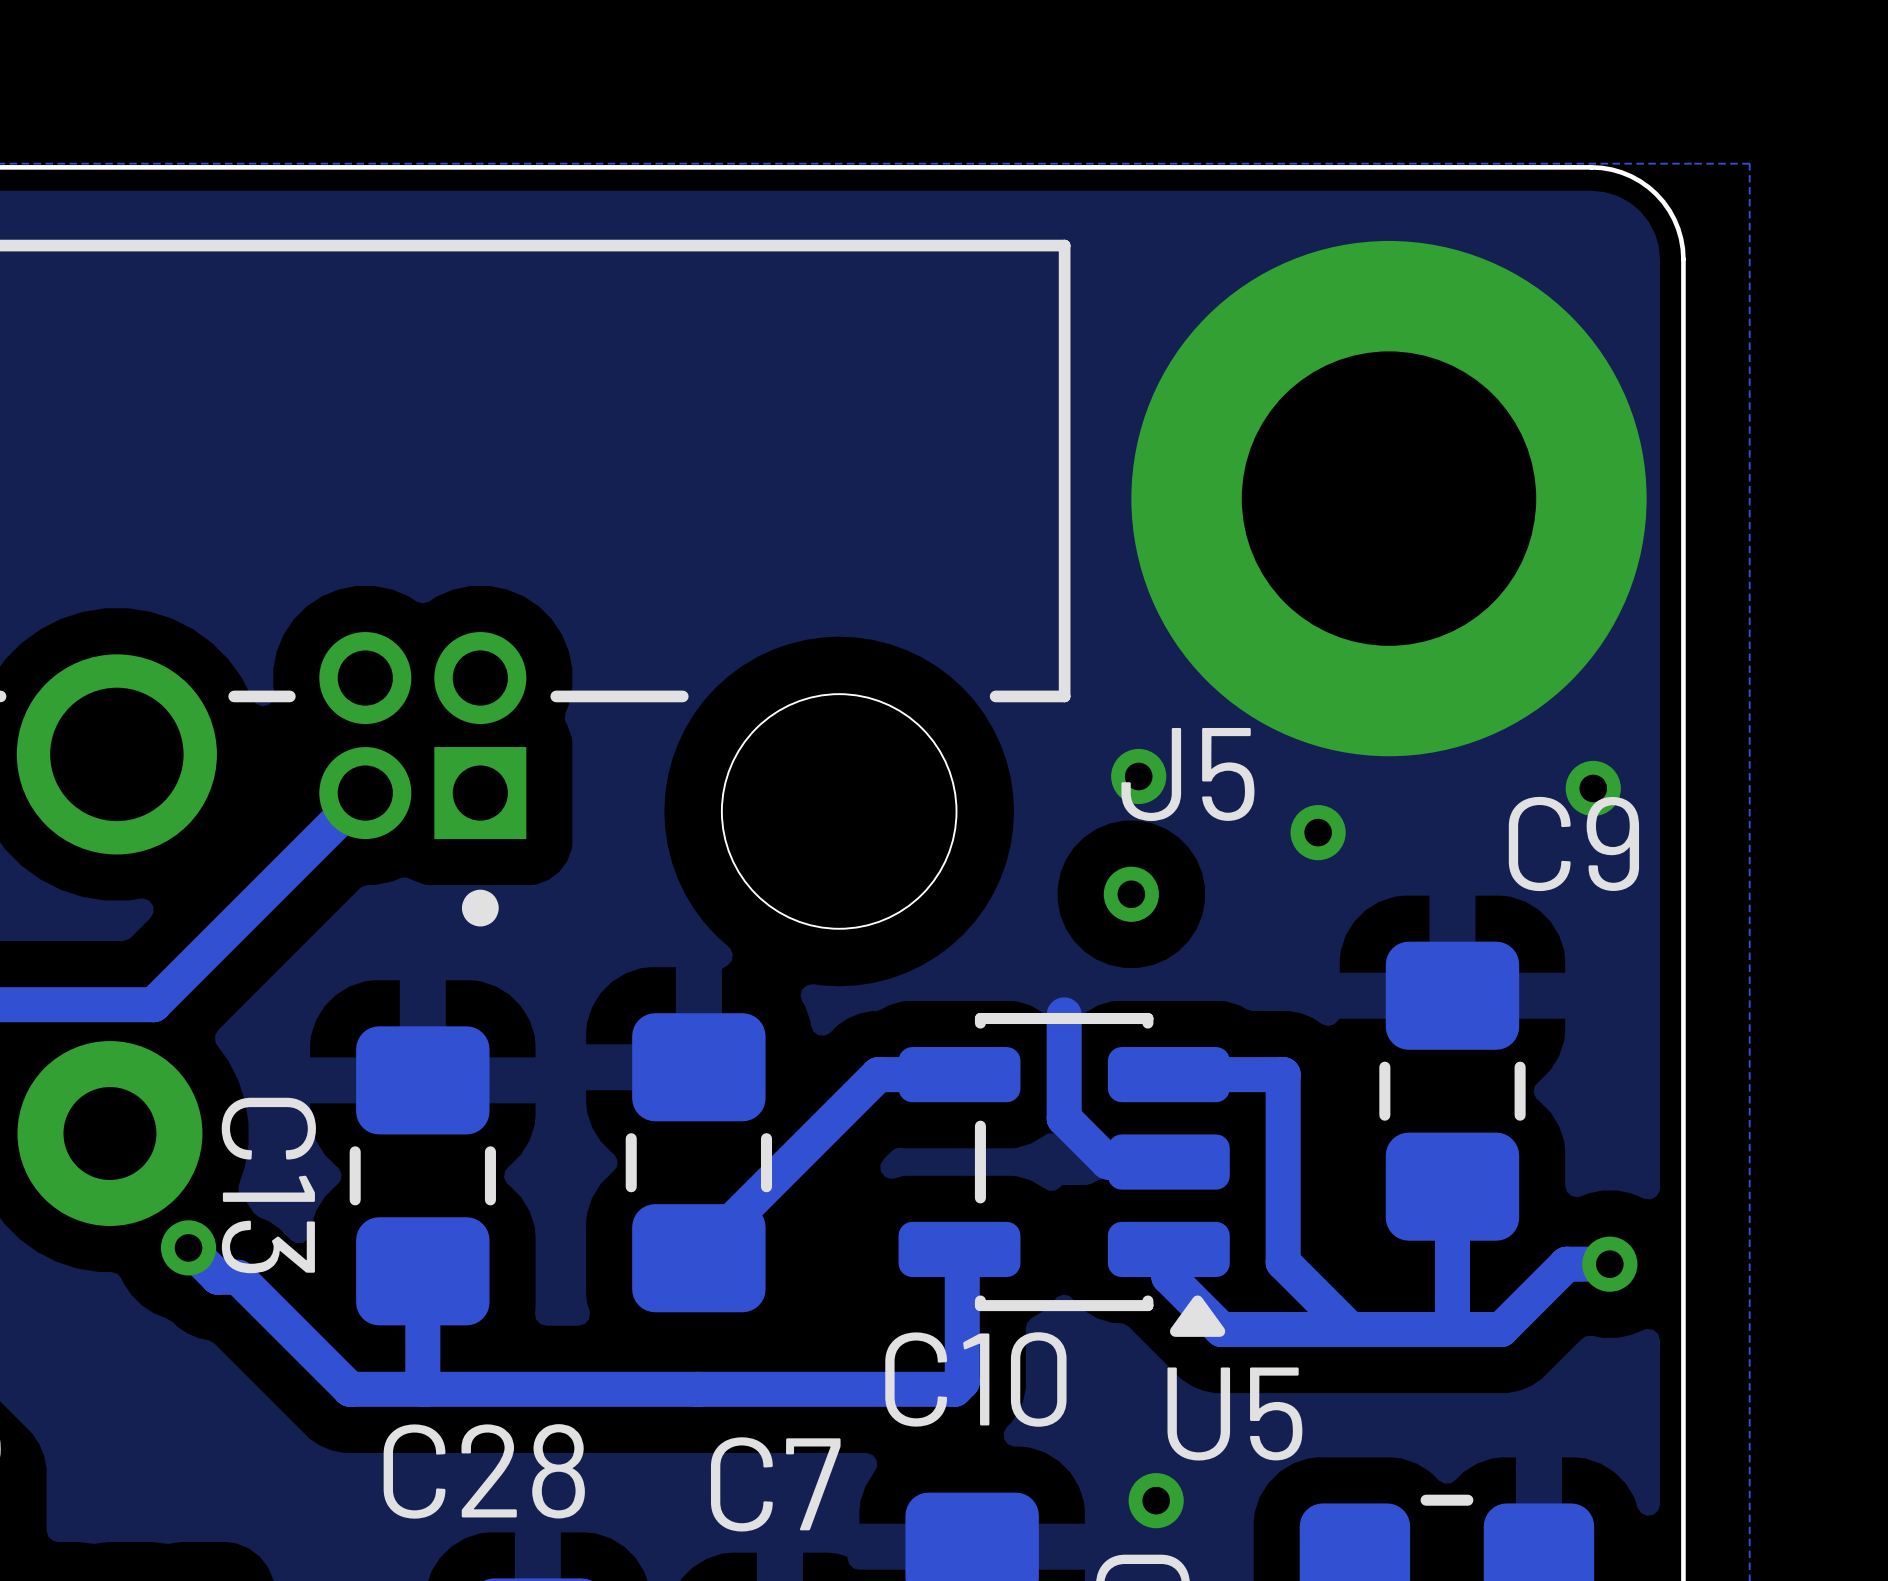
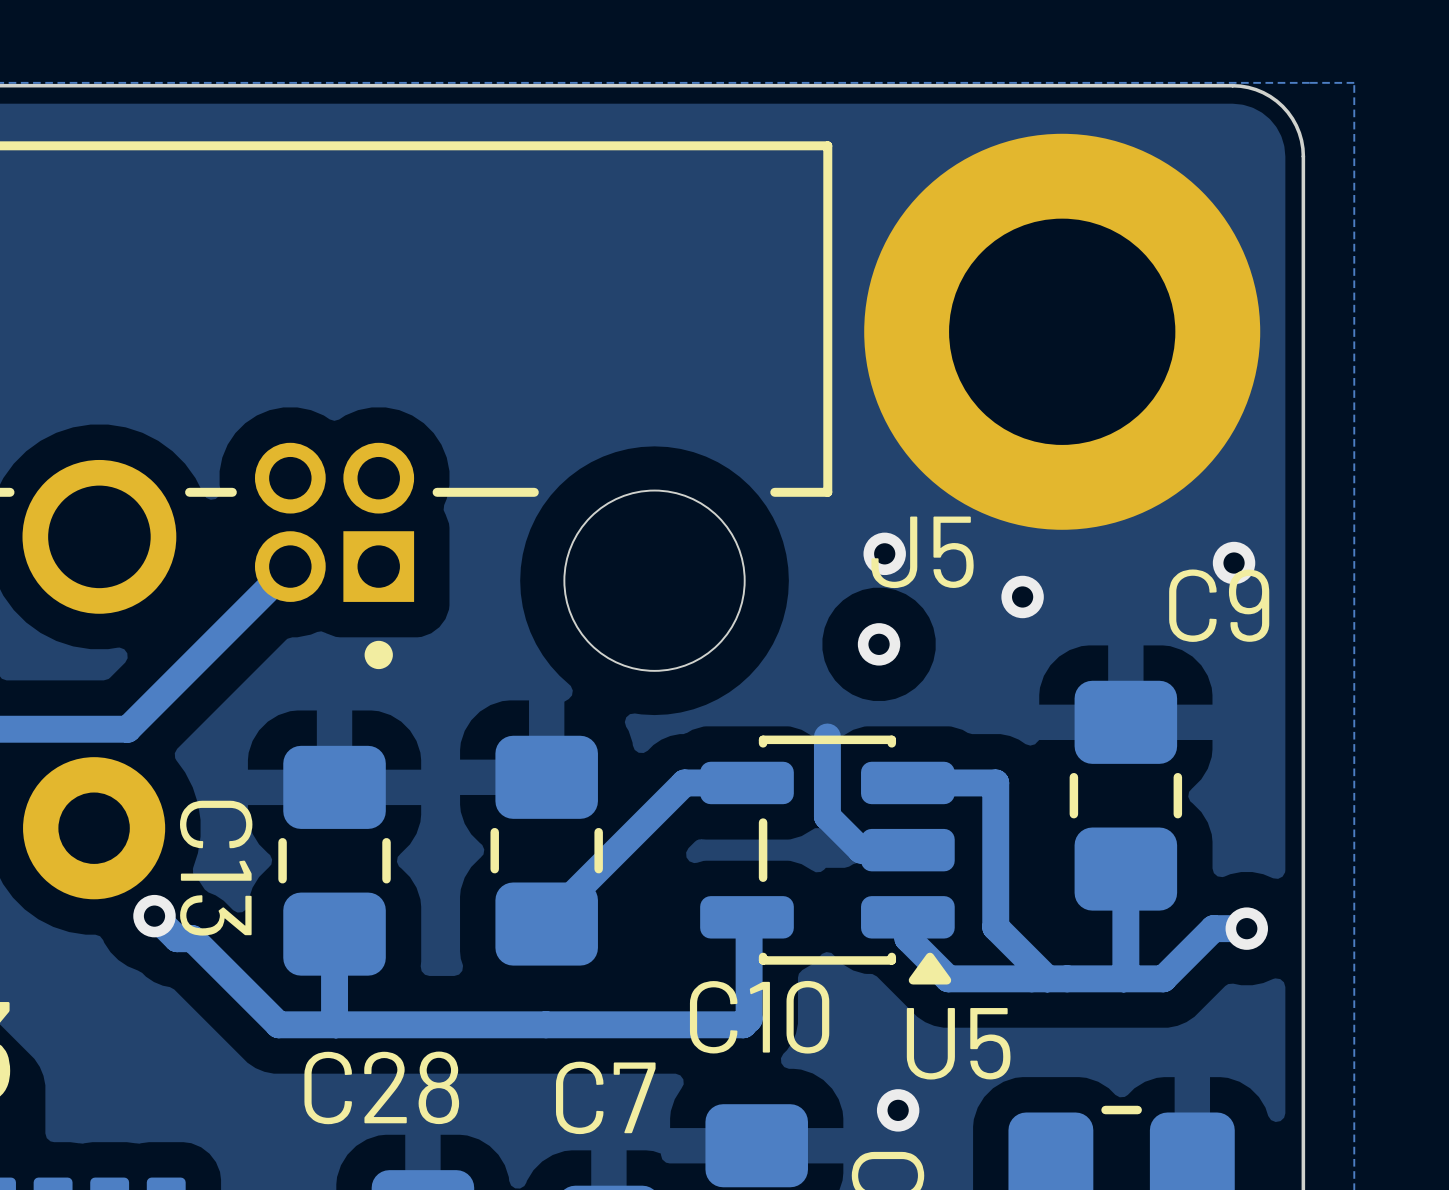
part position: (1388, 498) -> (1062, 331)

